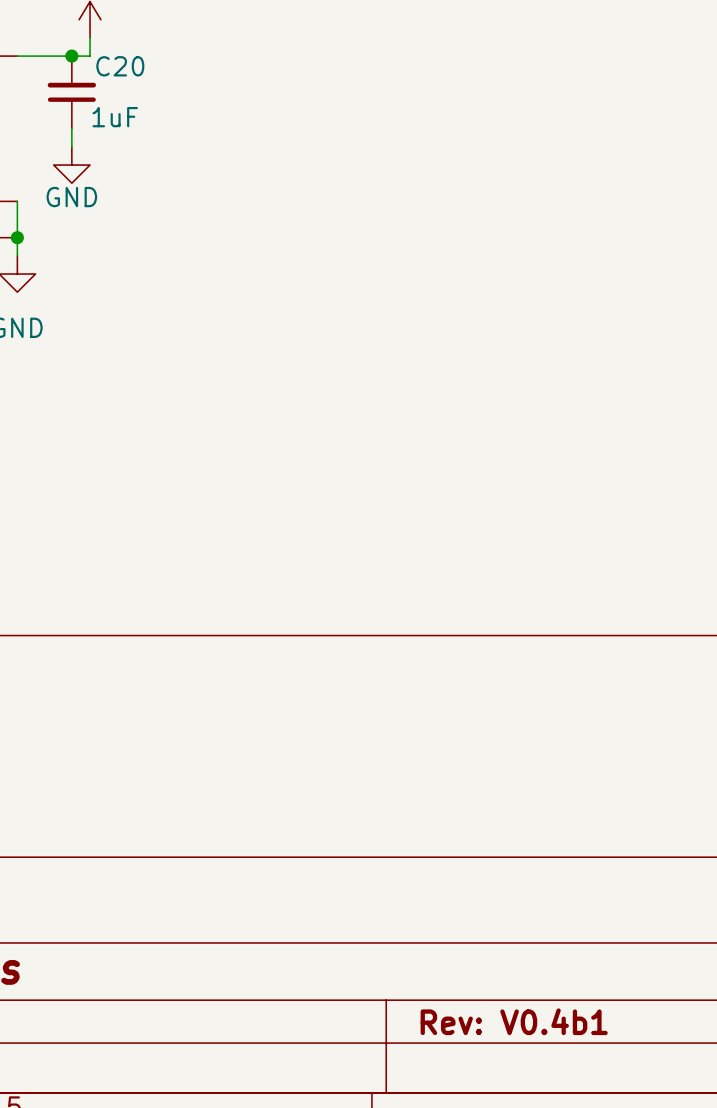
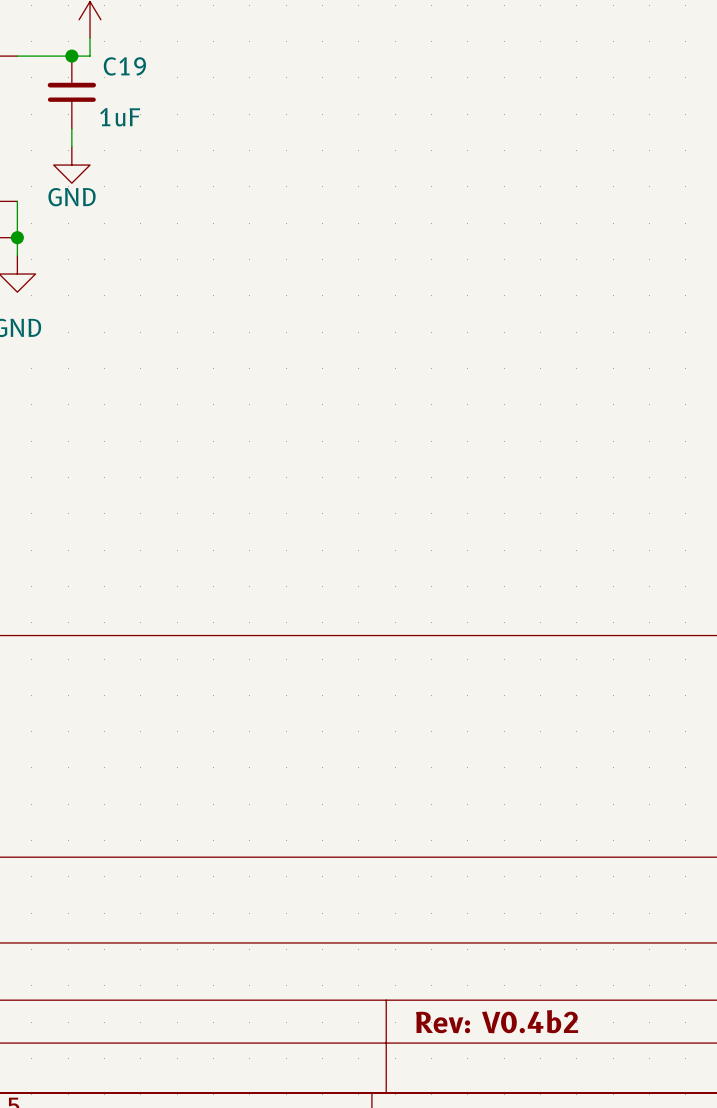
C20 name: C20 (120, 66) -> C19 (124, 66)
title block: Rev: V0.4b1 (514, 1021) -> Rev: V0.4b2 (497, 1021)

